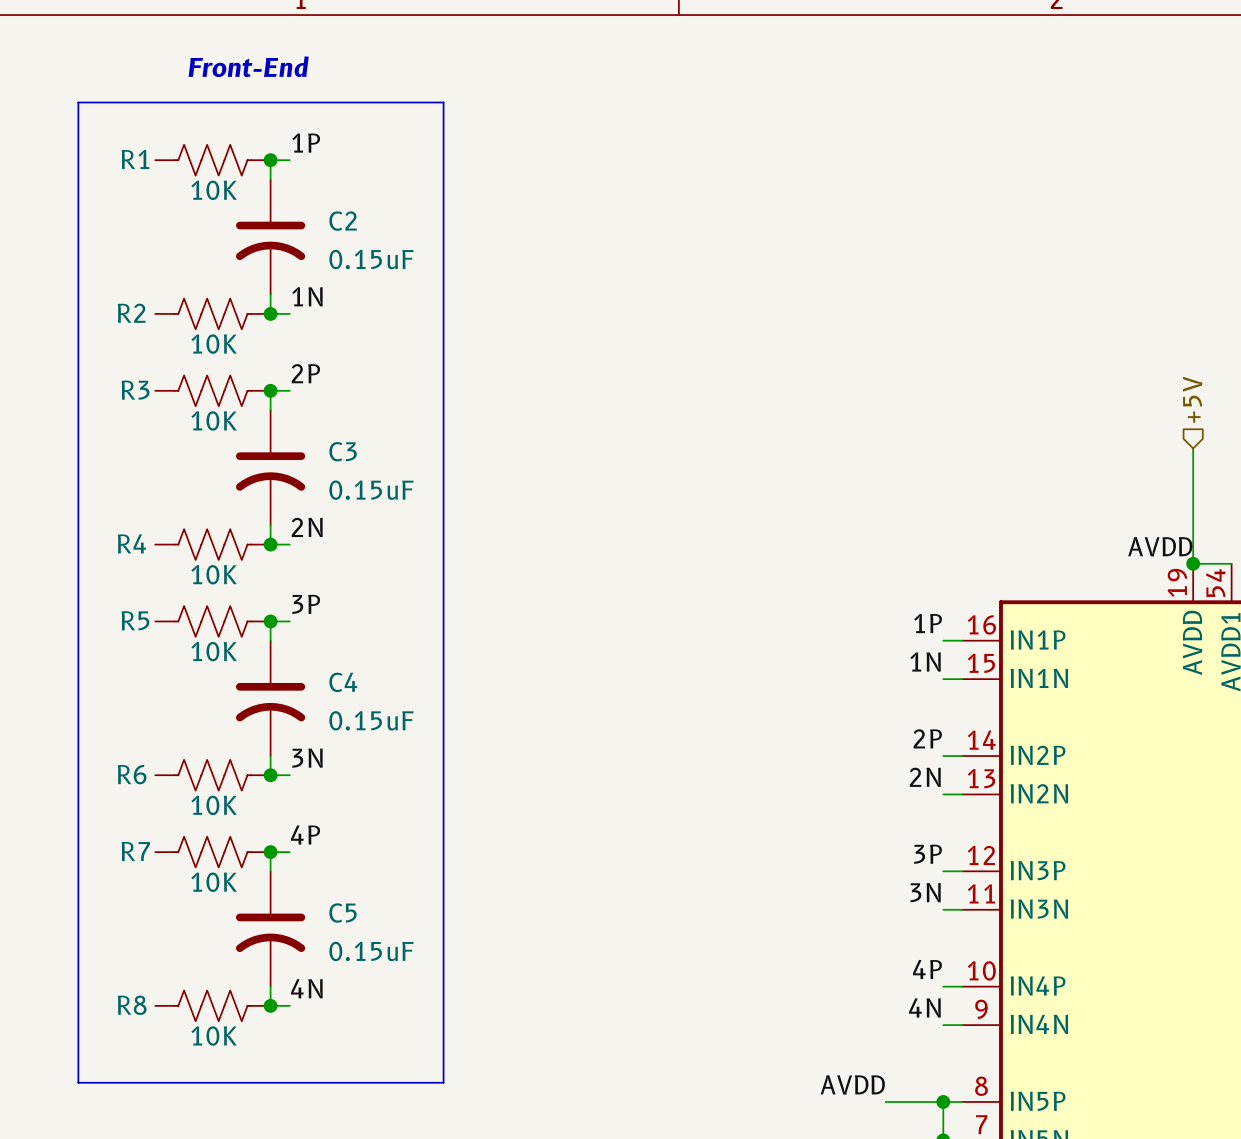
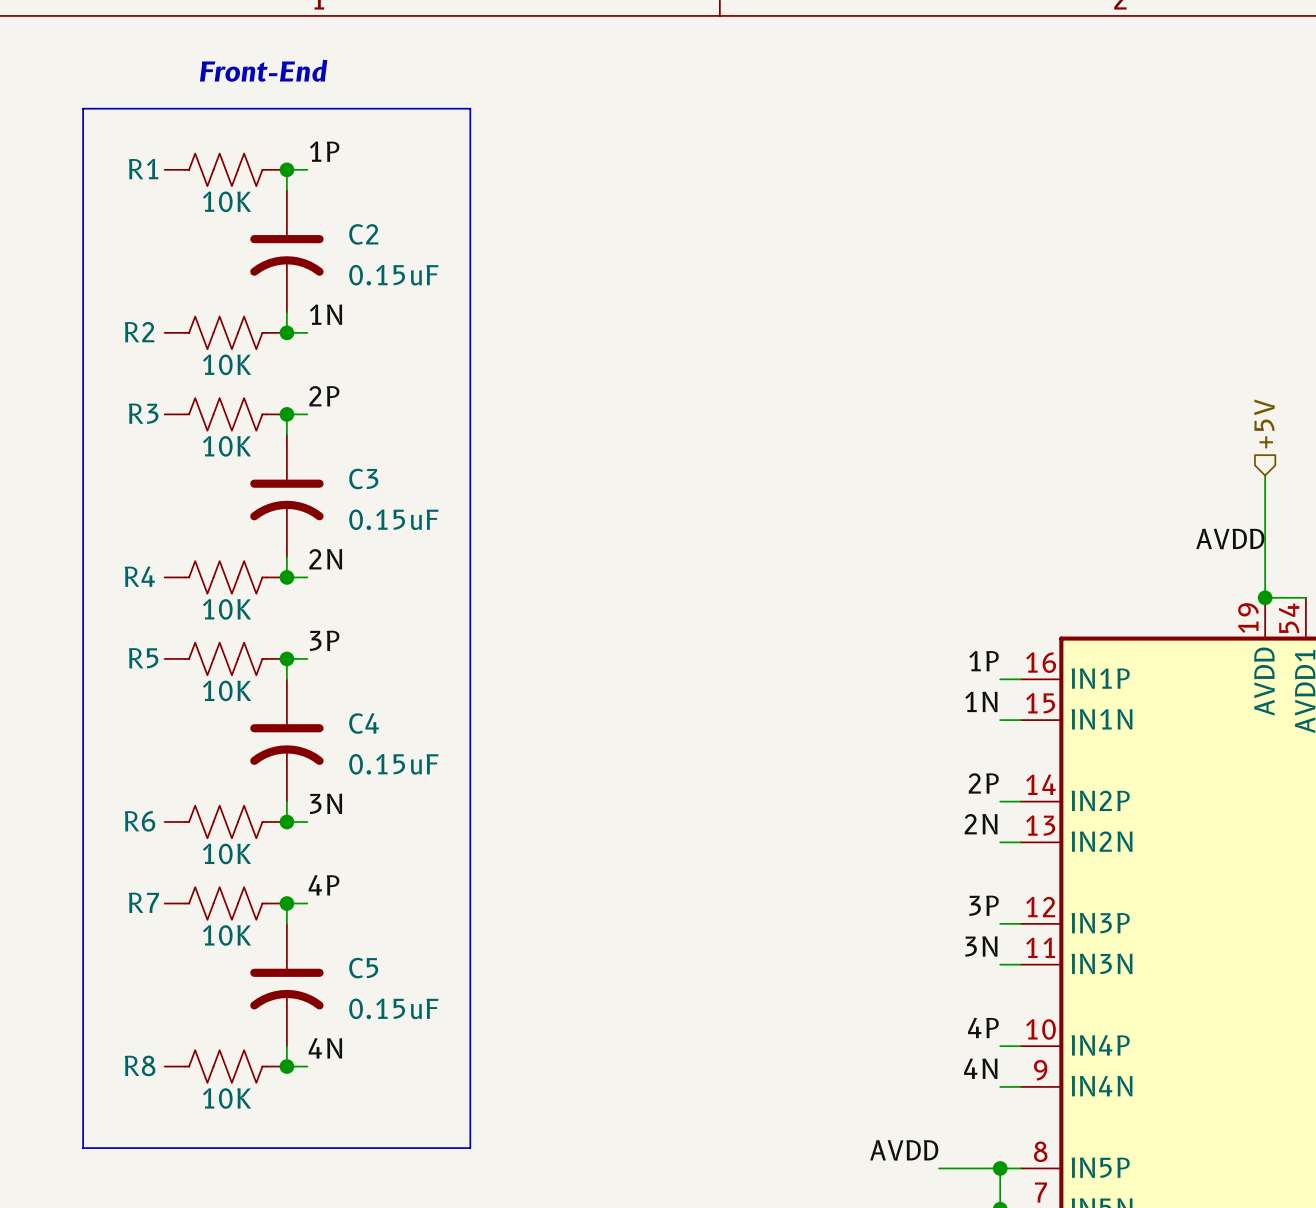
label position: AVDD (1160, 546) -> AVDD (1230, 539)

